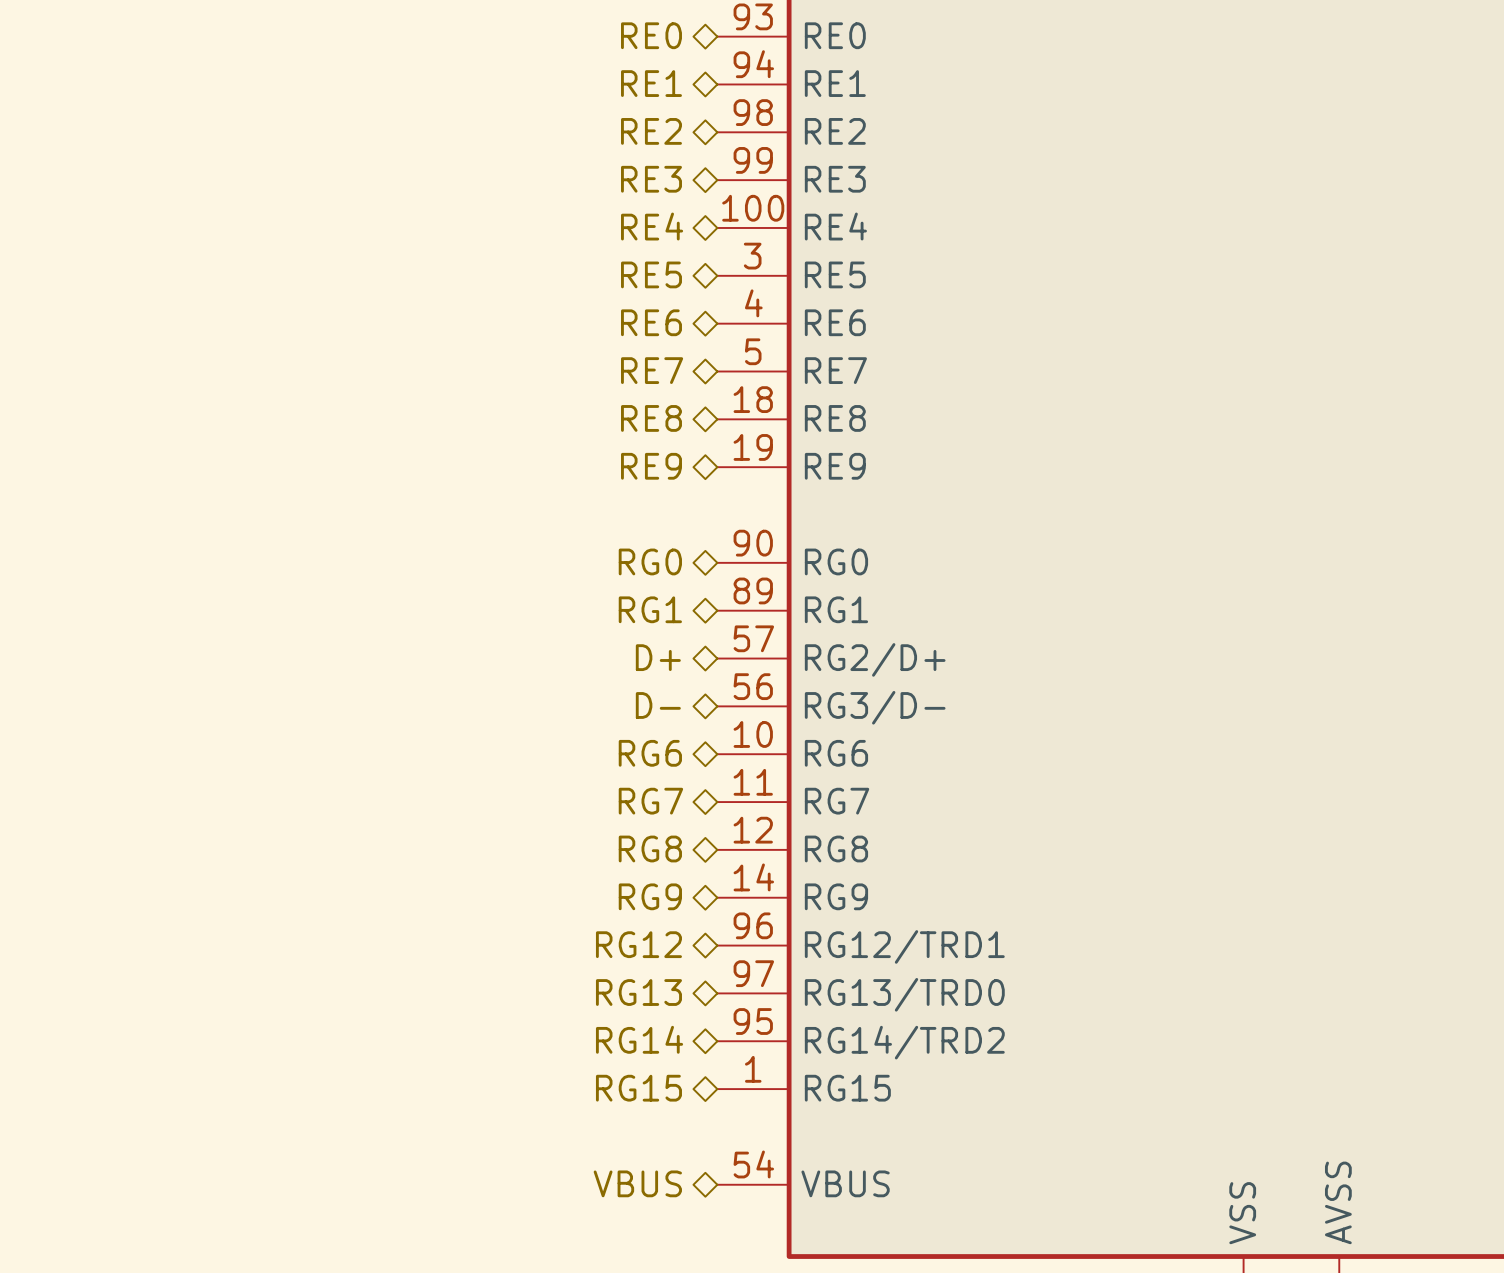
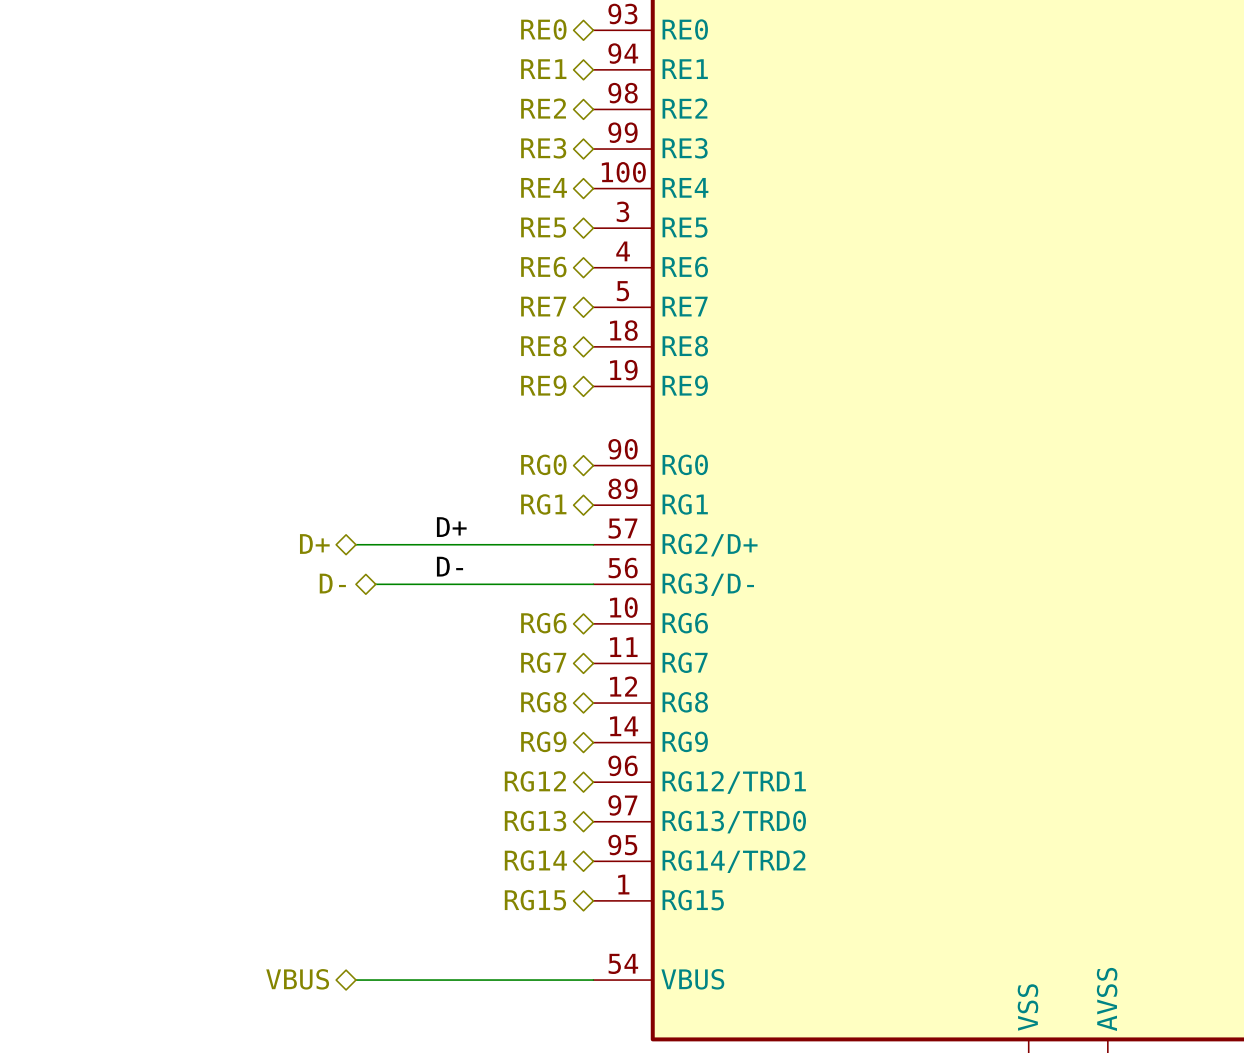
label: none -> D+ (451, 527)
hierarchical label position: D+ (658, 657) -> D+ (314, 544)
wire: none -> (355, 544) (593, 544)
label: none -> D- (450, 566)
hierarchical label position: D- (658, 705) -> D- (332, 583)
wire: none -> (375, 584) (593, 584)
hierarchical label position: VBUS (637, 1183) -> VBUS (297, 979)
wire: none -> (355, 980) (593, 980)

